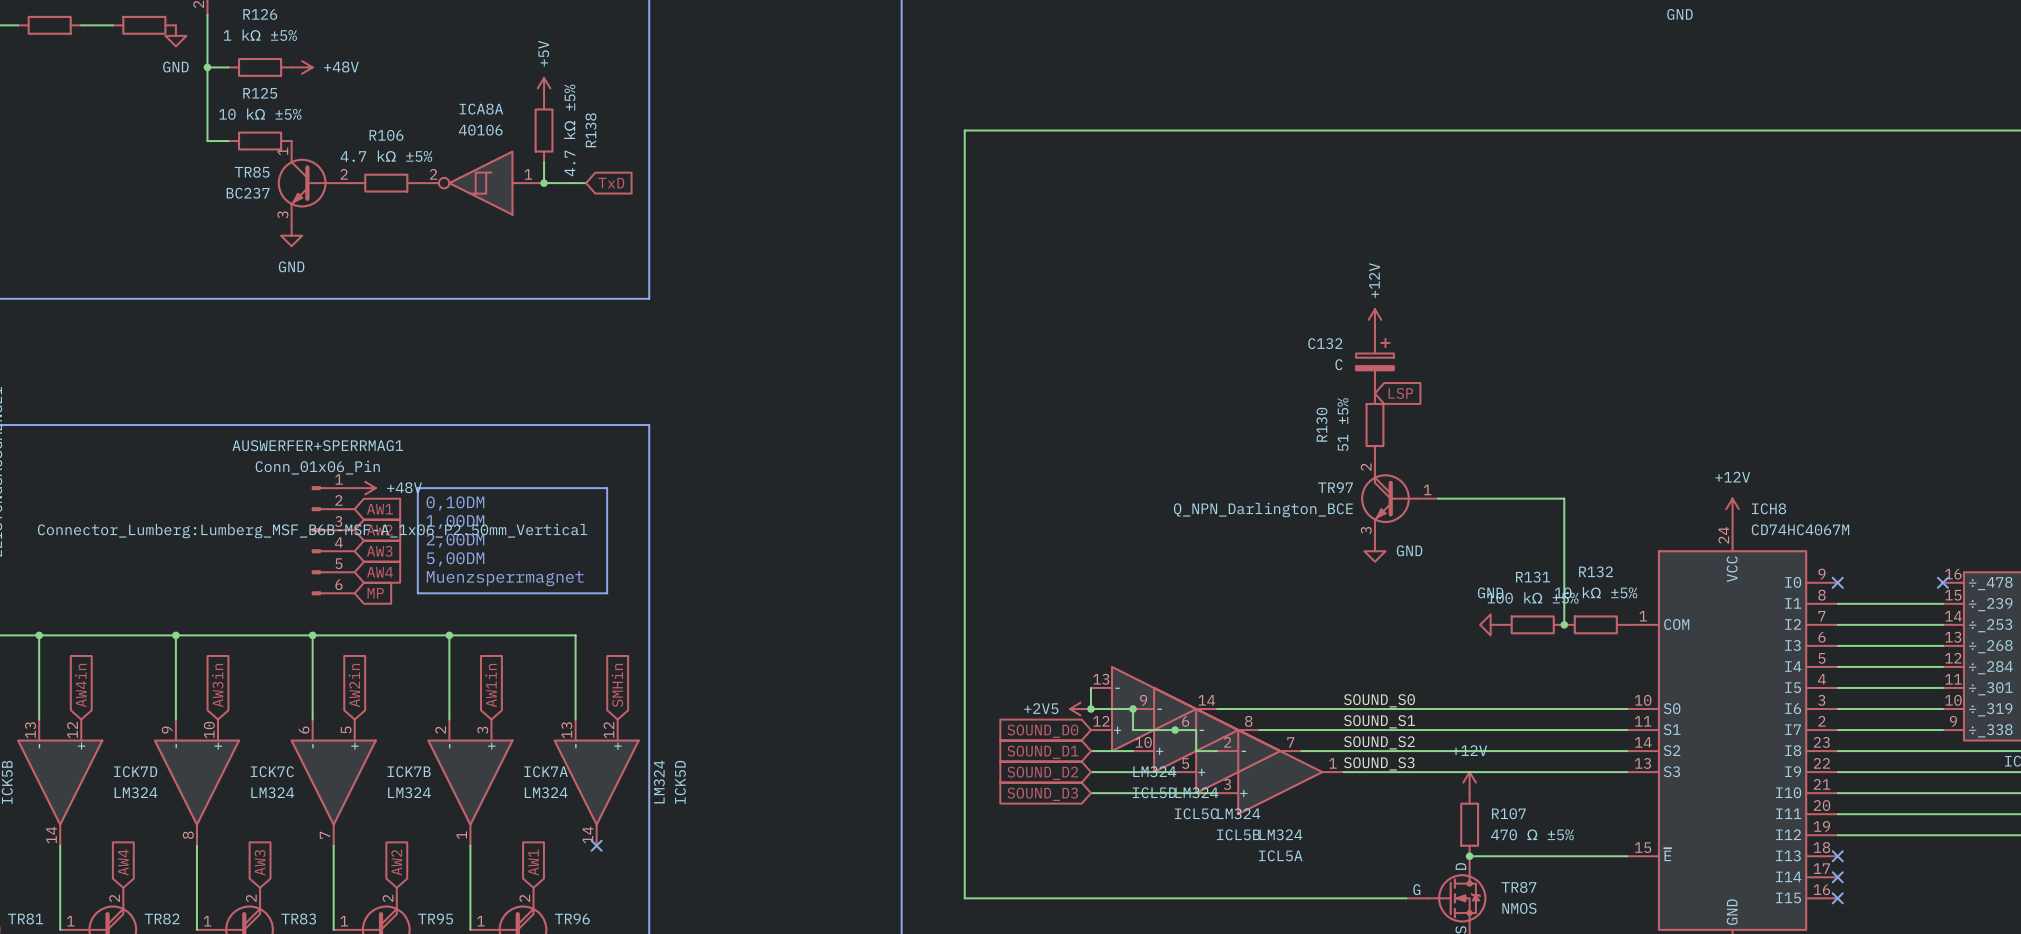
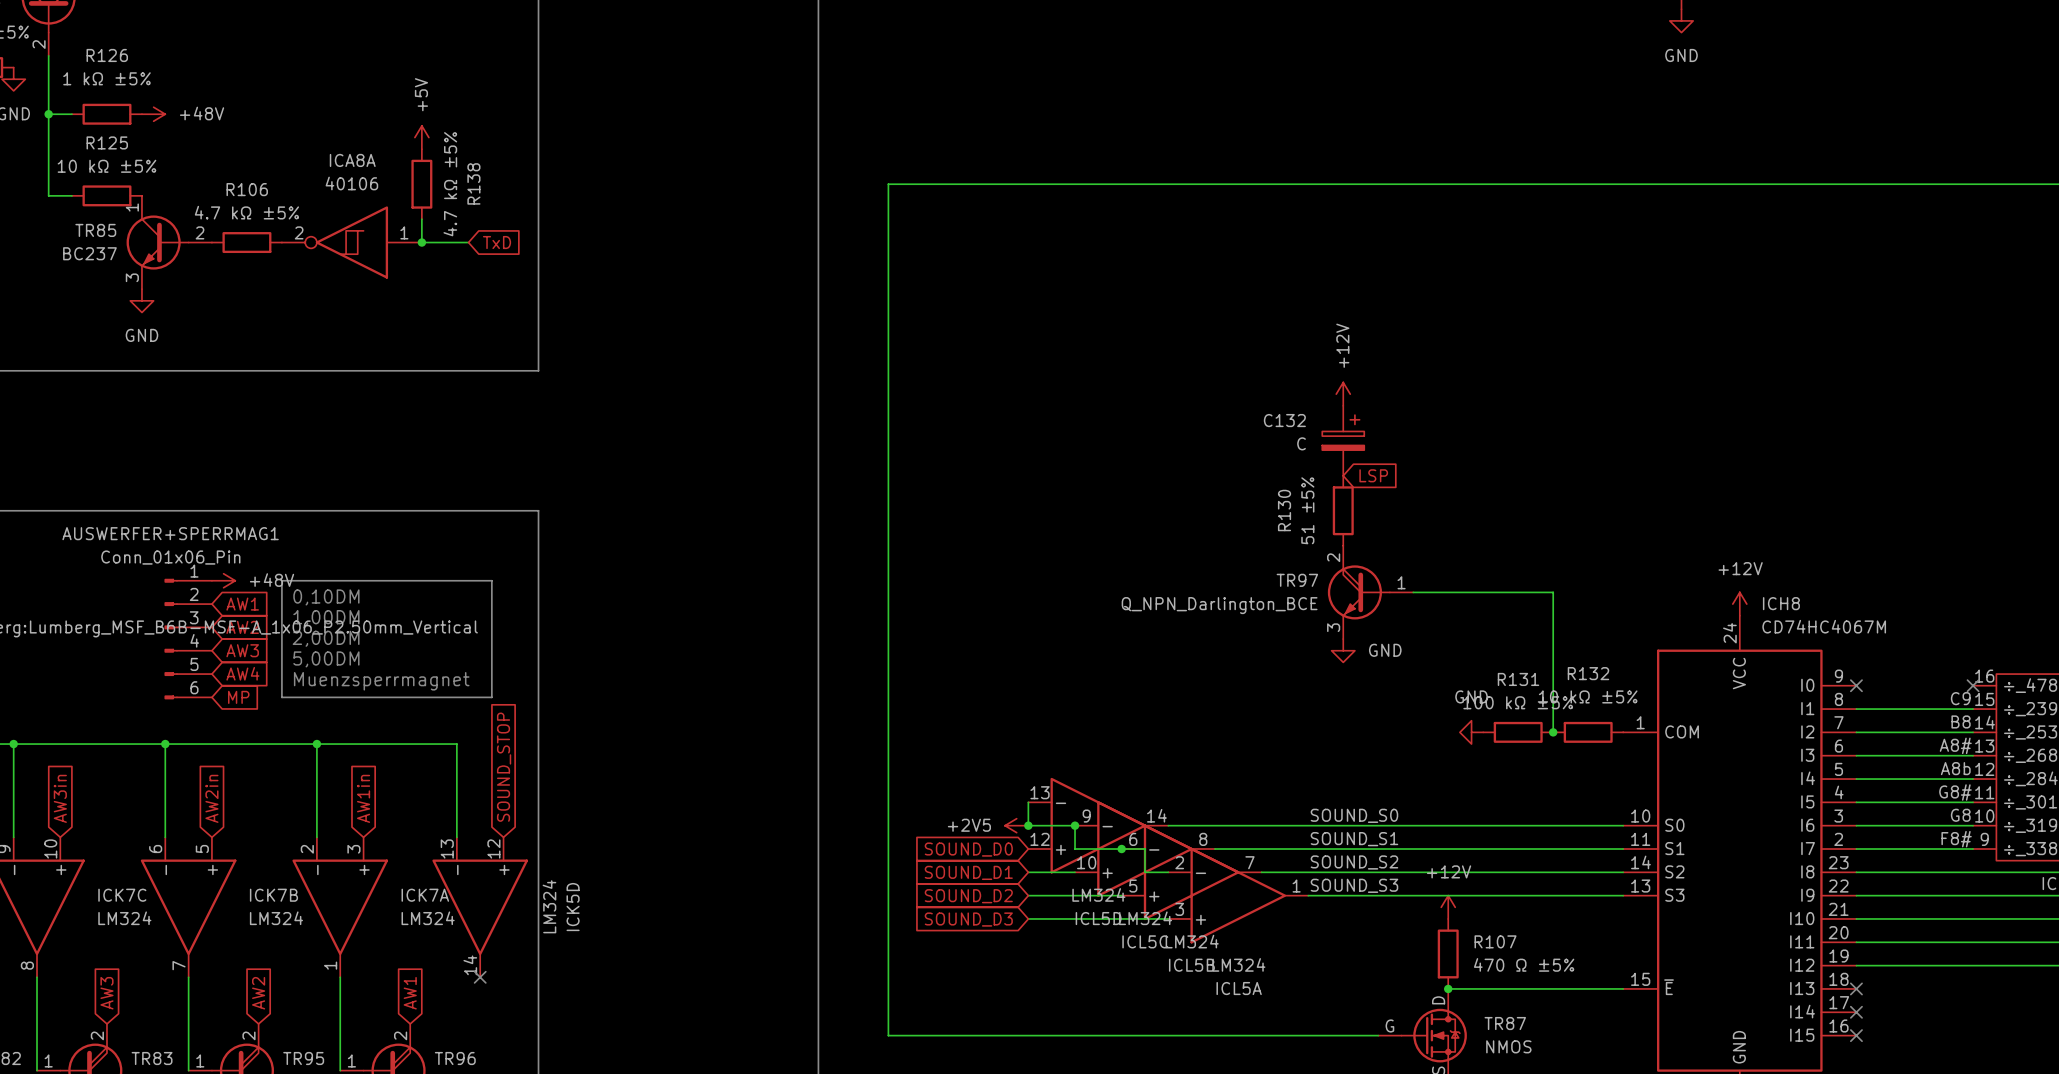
label: none -> C9 (1960, 698)
label: none -> B8 (1961, 721)
label: none -> A8# (1955, 745)
label: none -> A8b (1955, 768)
label: none -> G8# (1955, 792)
global label: SMHin (617, 685) -> SOUND_STOP (504, 767)
label: none -> G8 (1960, 815)
label: none -> F8# (1956, 839)

